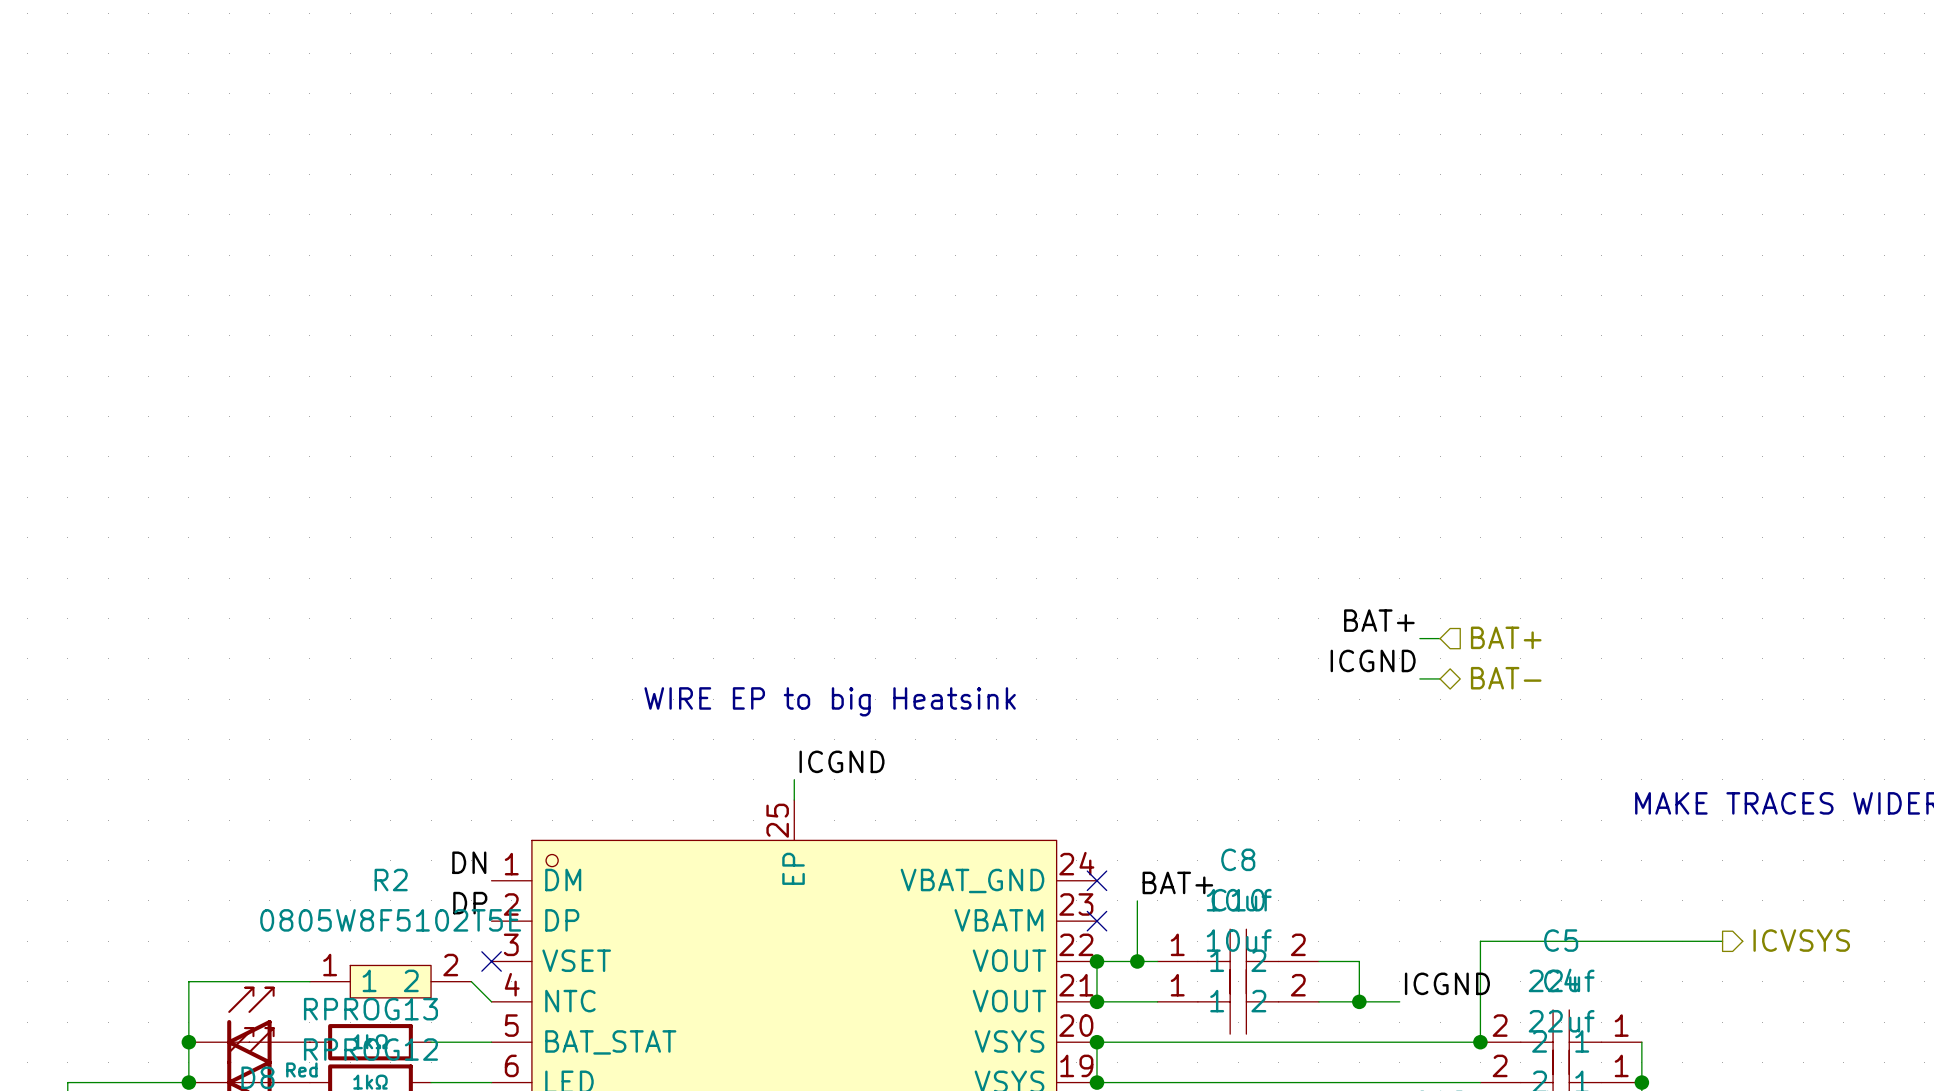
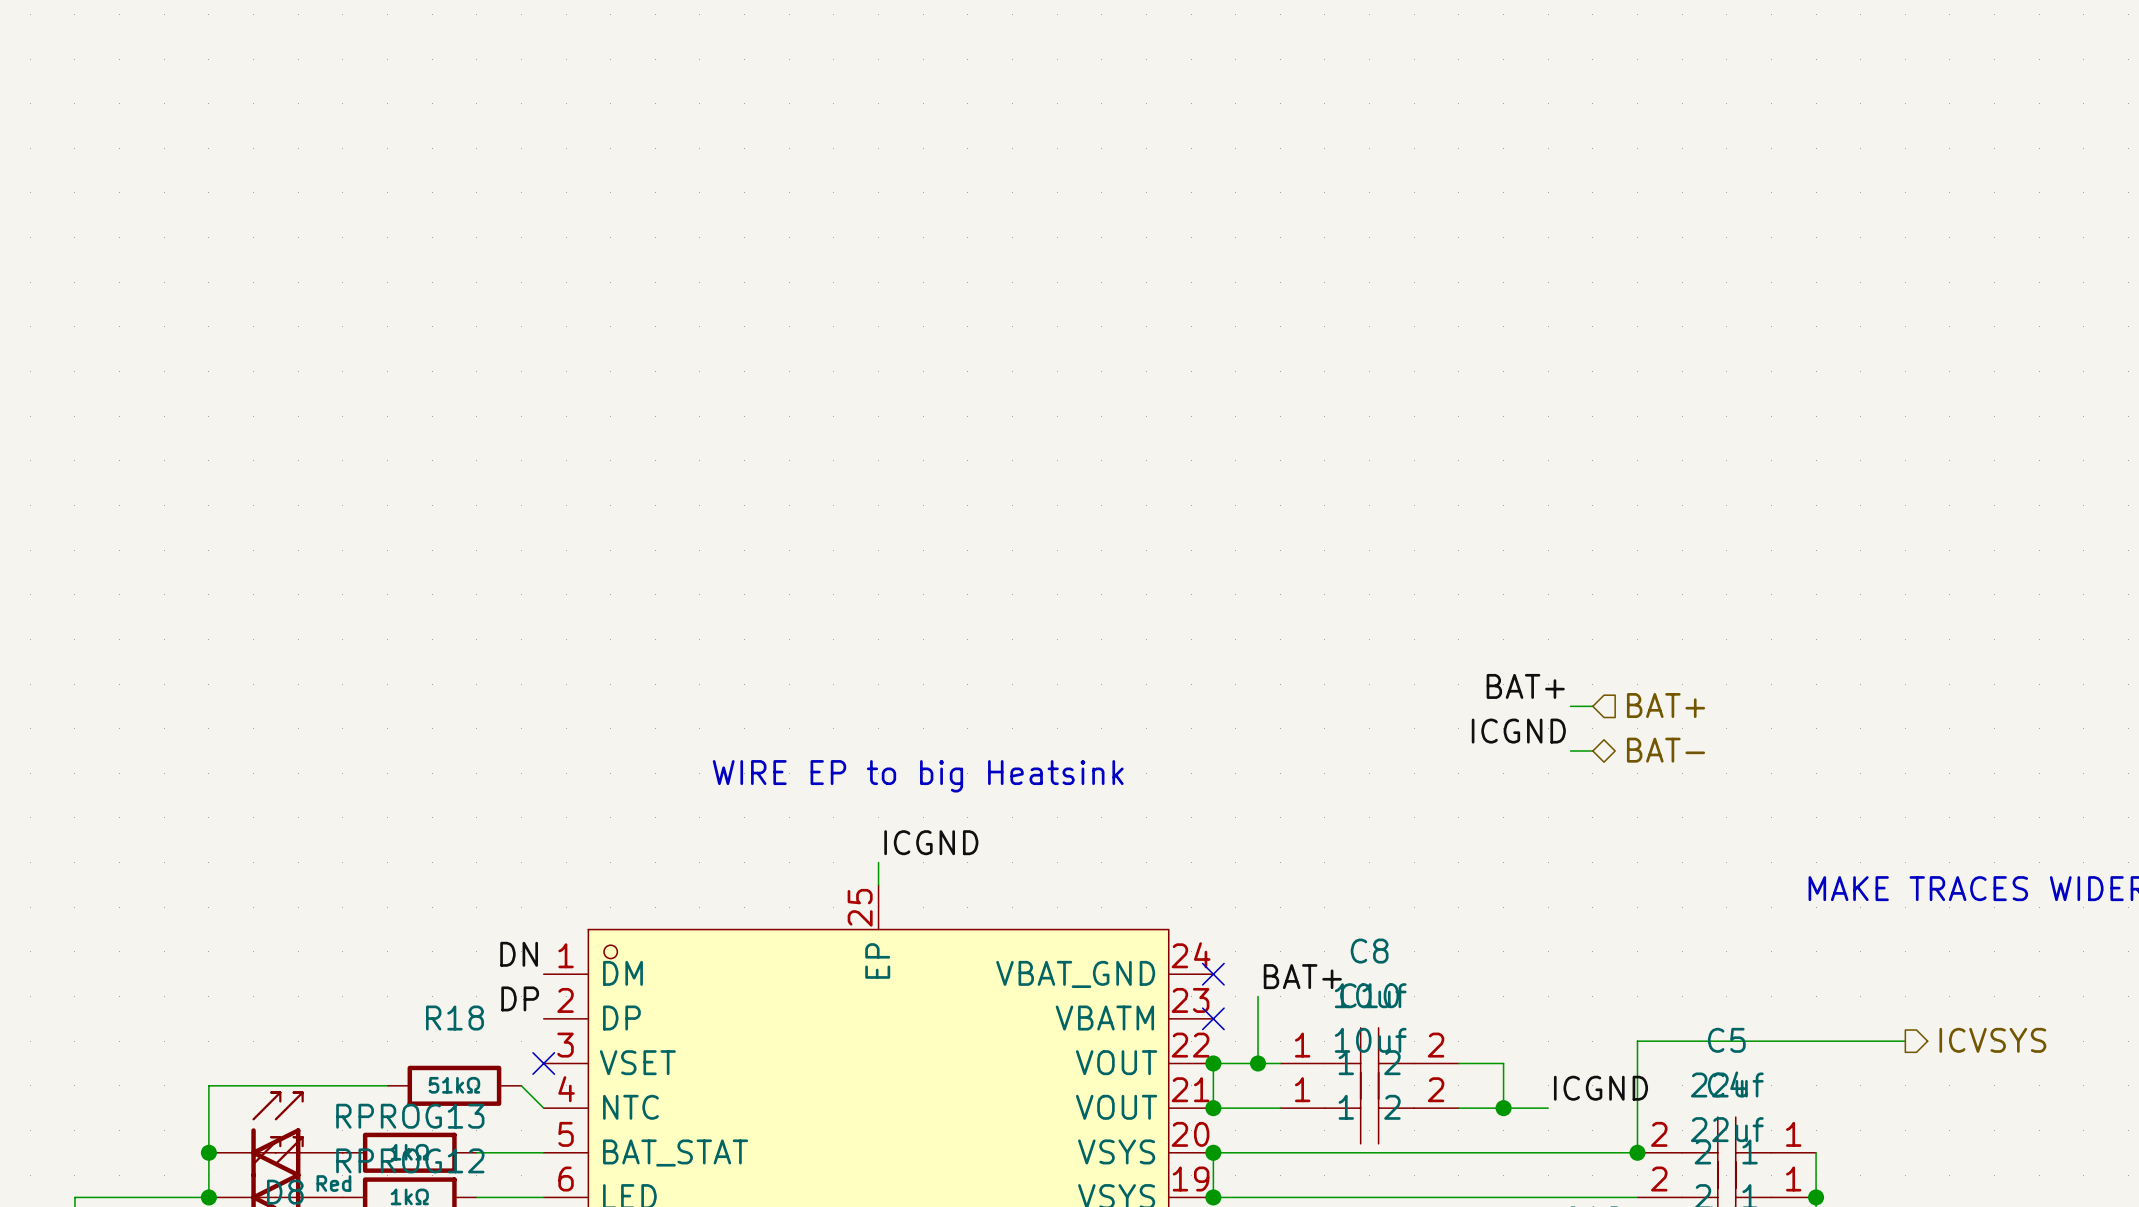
R2: 0805W8F5102T5E (390, 981) -> none
R18: none -> 51kΩ (454, 1085)

